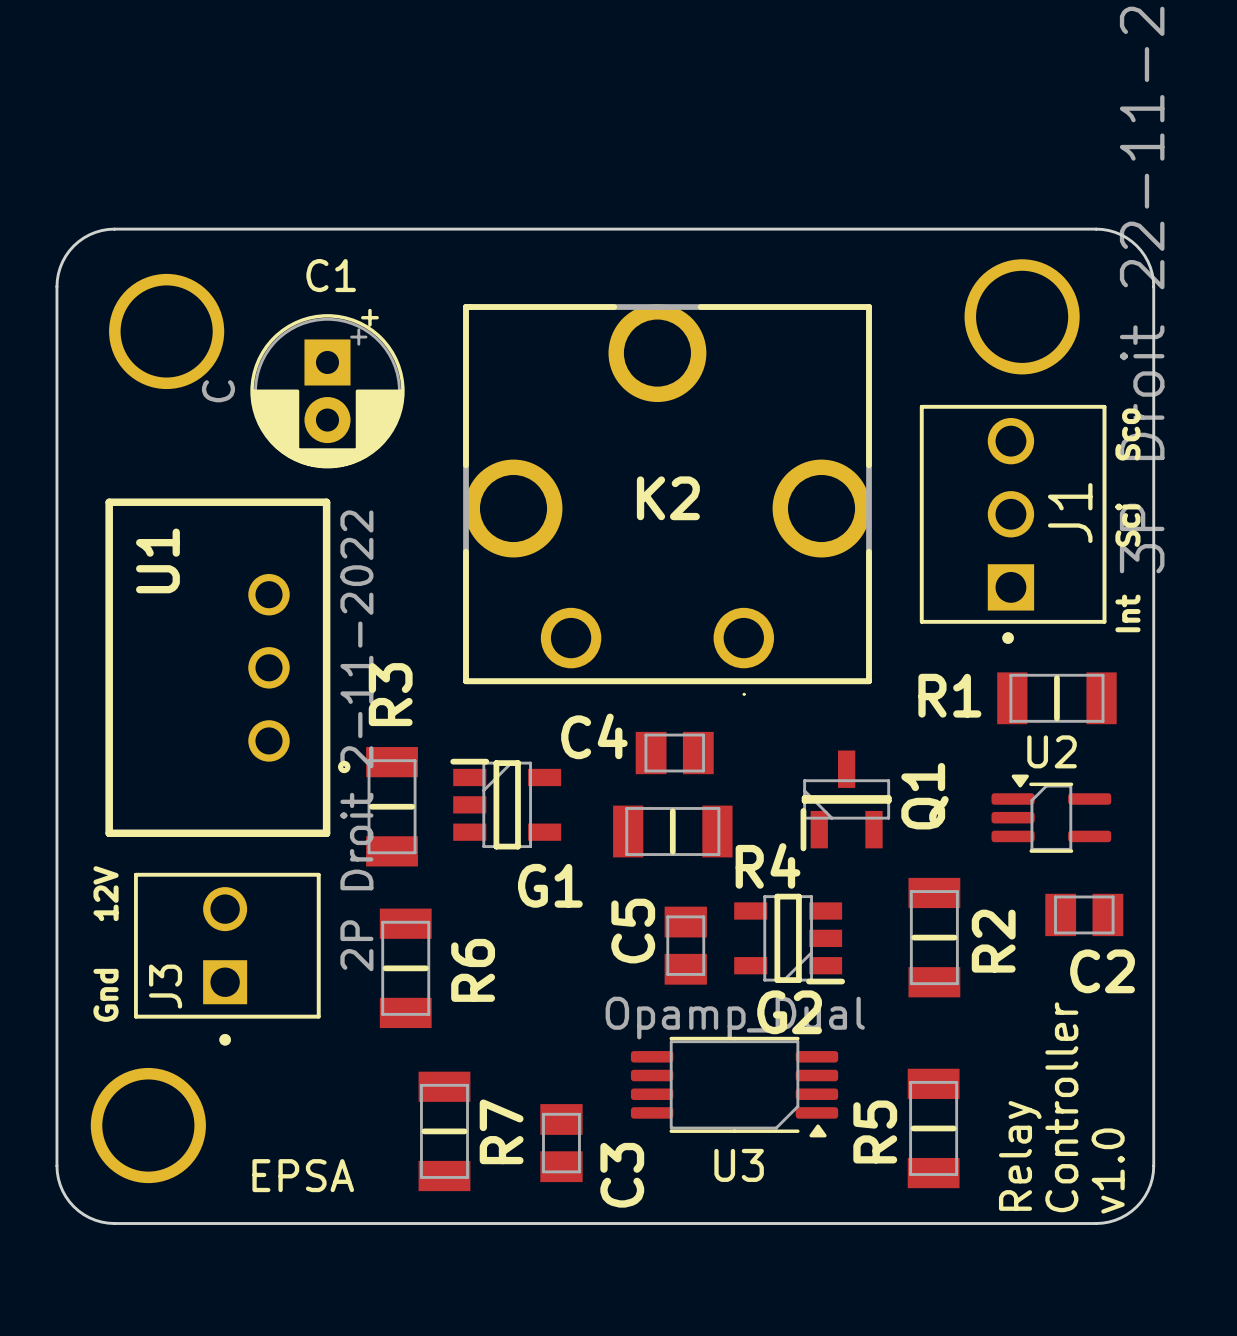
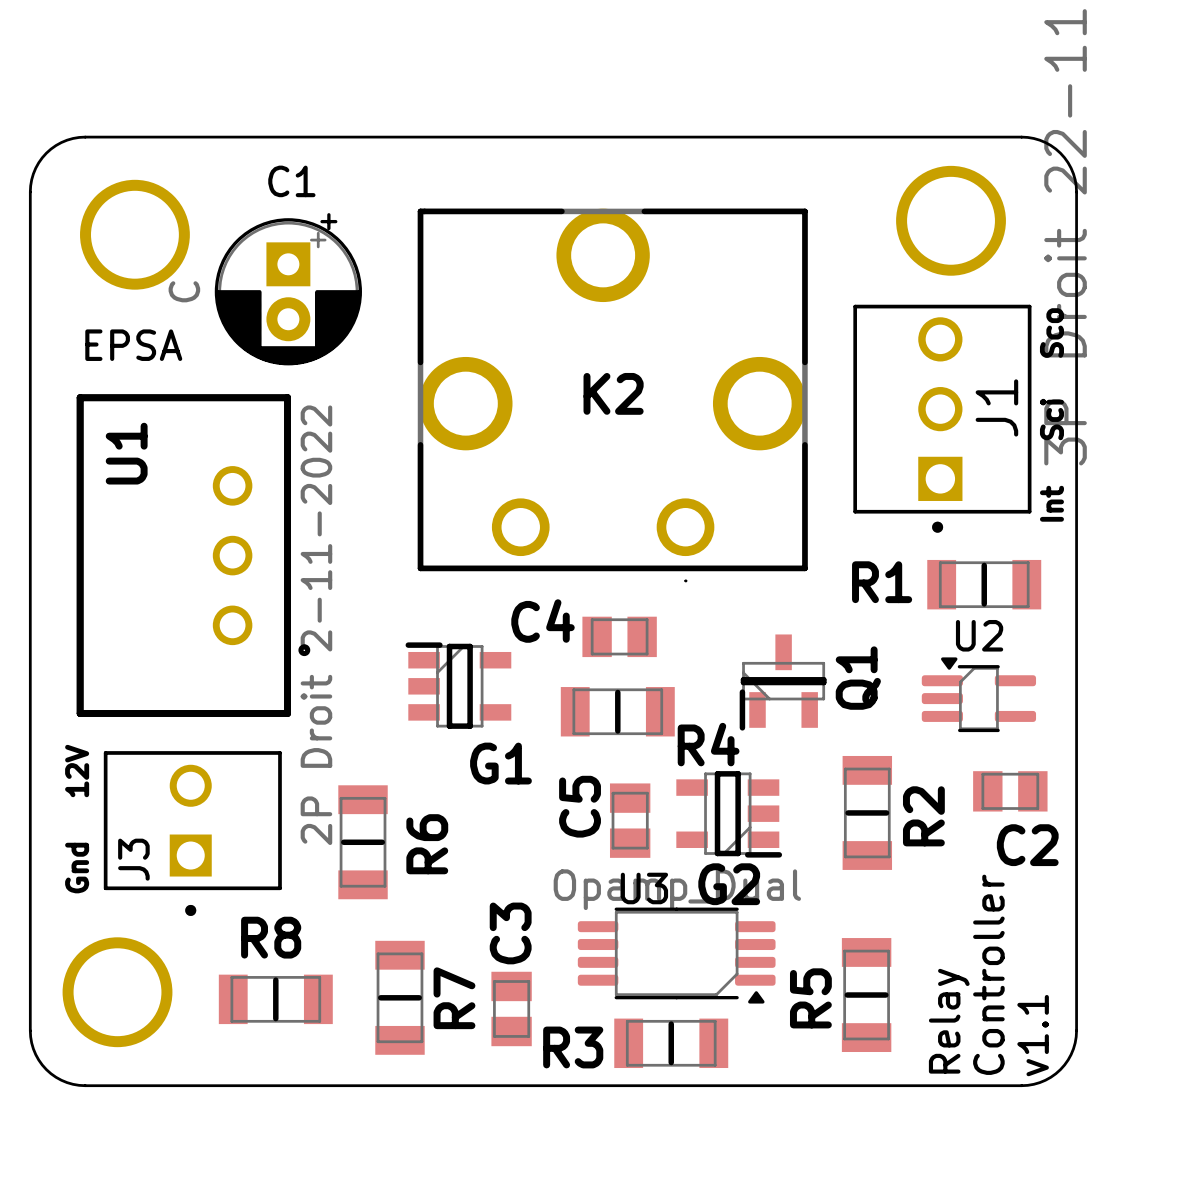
text: none -> EPSA (133, 345)
R3 name position: R3 (390, 694) -> R3 (573, 1047)
R3 rotation: 0° (392, 806) -> 90° clockwise (671, 1043)
R3 position: (392, 806) -> (671, 1043)
R8: none -> (275, 999)
U3 name position: U3 (739, 1165) -> U3 (644, 888)
text: v1.0 (1108, 1171) -> v1.1 (1033, 1035)
text: EPSA (303, 1175) -> none
C3 name position: C3 (622, 1175) -> C3 (510, 933)

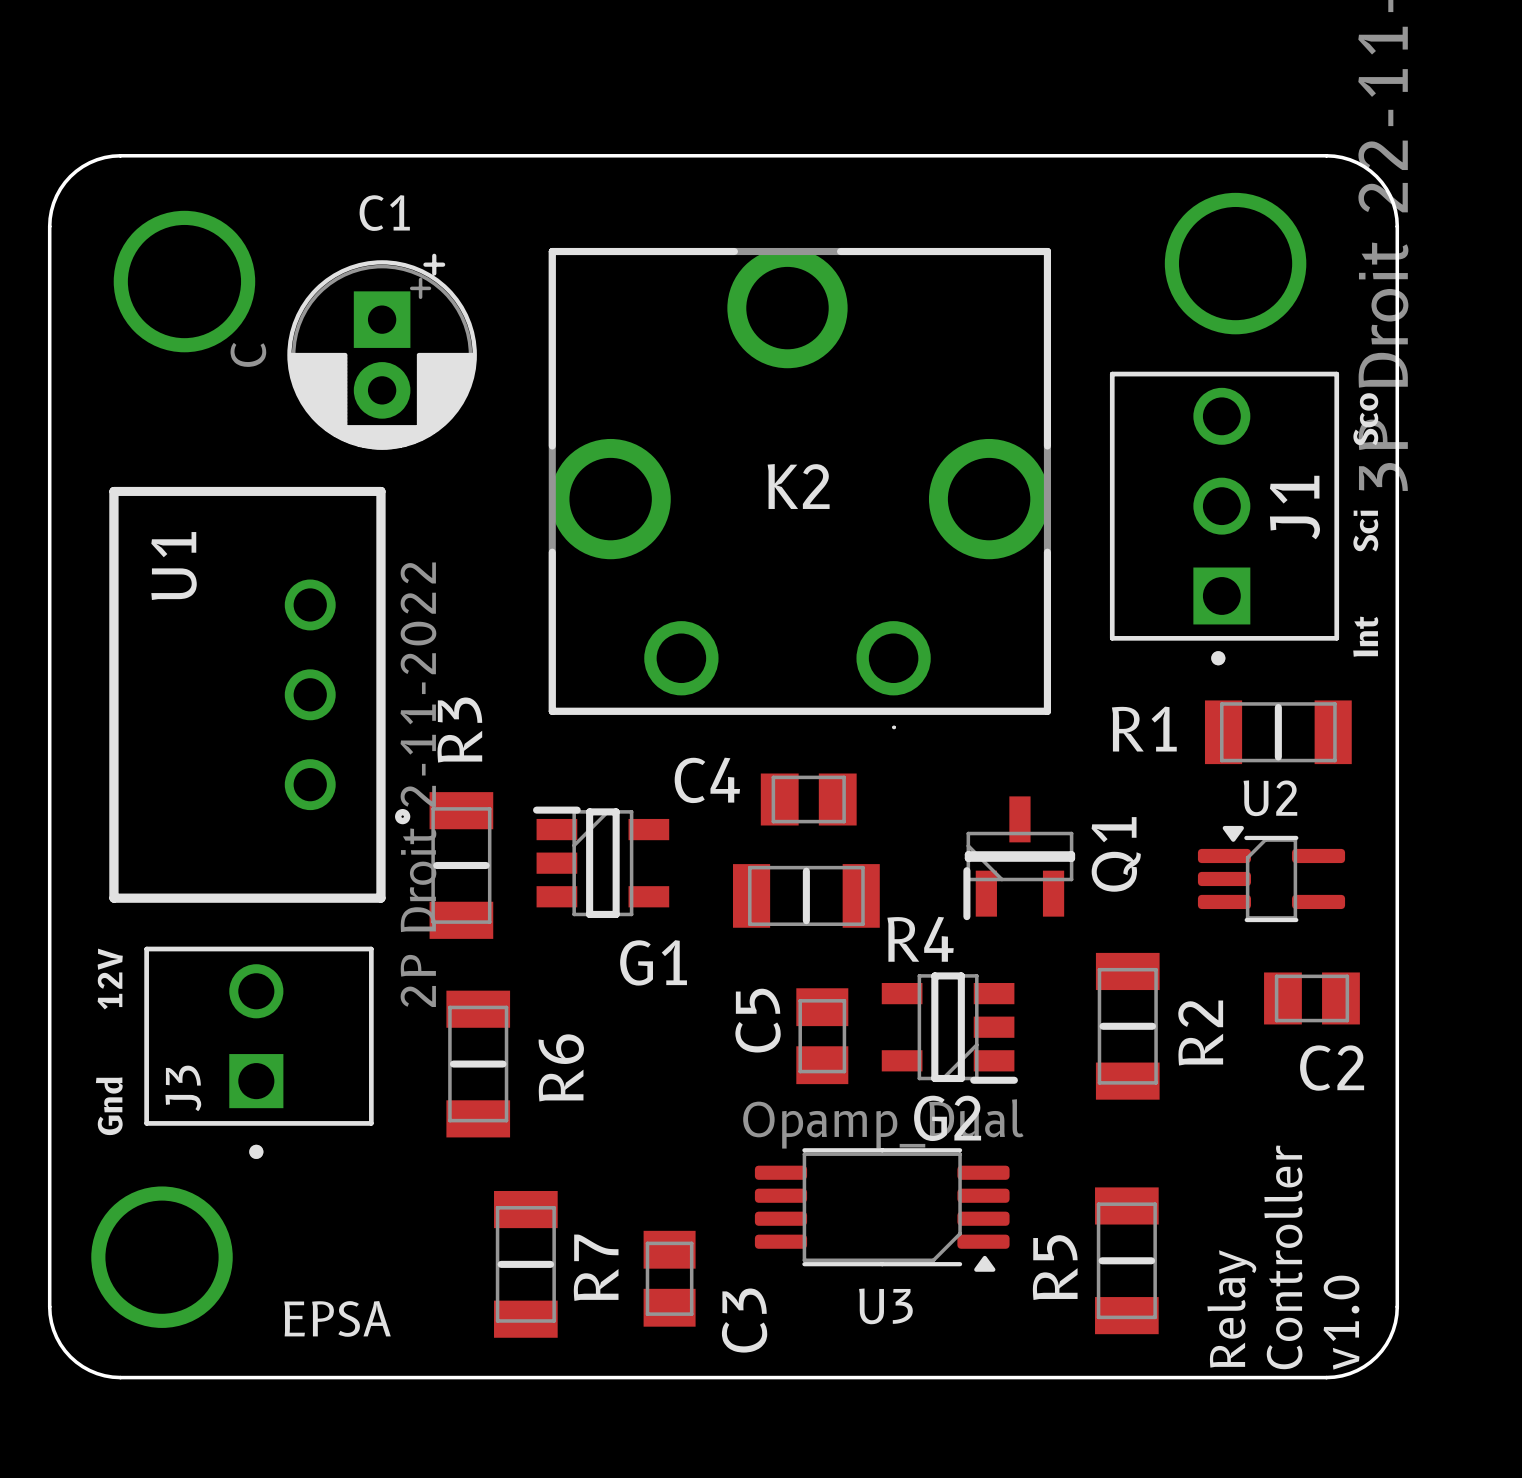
text: EPSA (133, 345) -> none
U3 name position: U3 (644, 888) -> U3 (885, 1306)
C3 name position: C3 (510, 933) -> C3 (744, 1320)
R8: (275, 999) -> none
text: v1.1 (1033, 1035) -> v1.0 (1341, 1322)
text: none -> EPSA (337, 1318)
R3 rotation: 0° (671, 1043) -> 90° clockwise (461, 865)
R3 position: (671, 1043) -> (461, 865)

